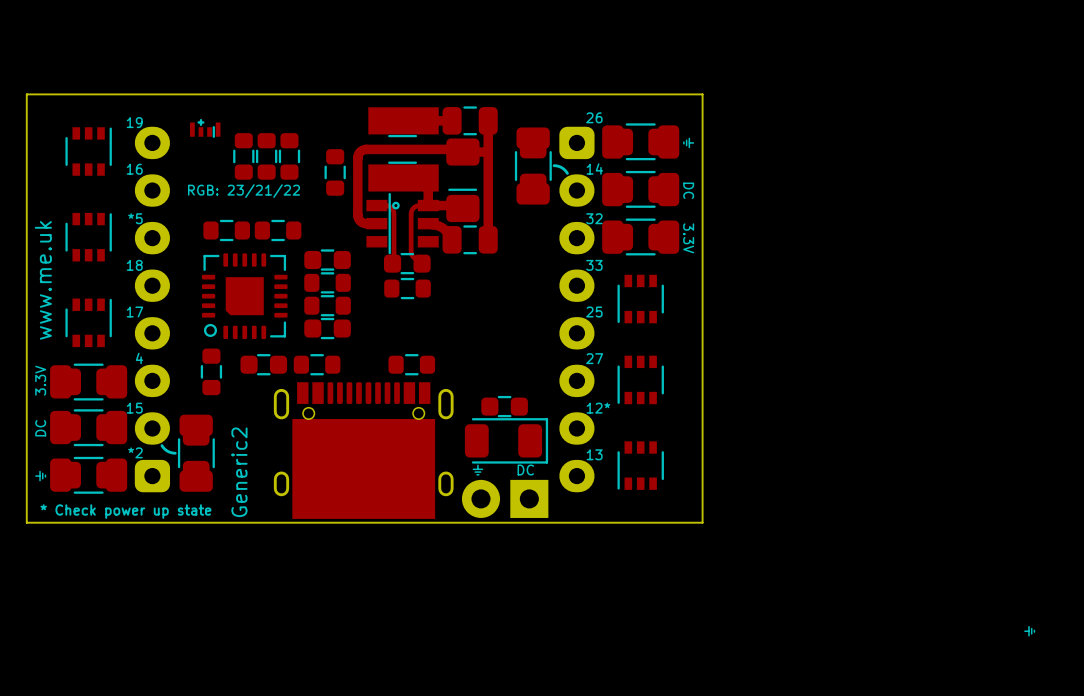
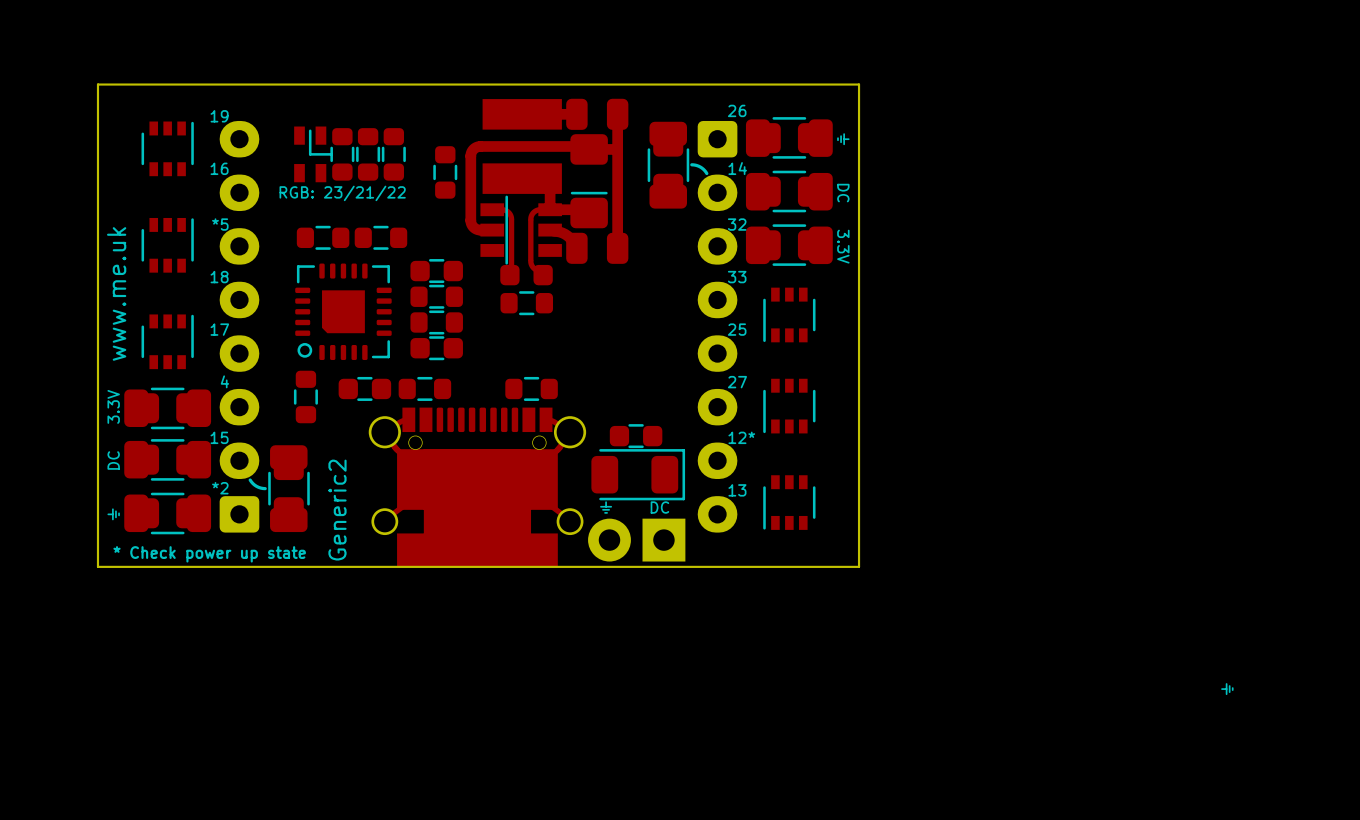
drawing: [463, 106, 477, 136] -> none
part footprint: [353, 107, 498, 273] -> [465, 98, 629, 286]
part footprint: [134, 126, 171, 493] -> [219, 120, 260, 533]
part footprint: [559, 126, 595, 493] -> [697, 120, 738, 533]
part: (205, 128) -> none
drawing: [388, 134, 418, 164] -> none
part: none -> (313, 154)
drawing: [448, 188, 478, 191] -> none
drawing: [463, 225, 477, 255] -> none
drawing: [400, 252, 415, 275] -> none
part footprint: [273, 382, 454, 519] -> [368, 407, 587, 567]

